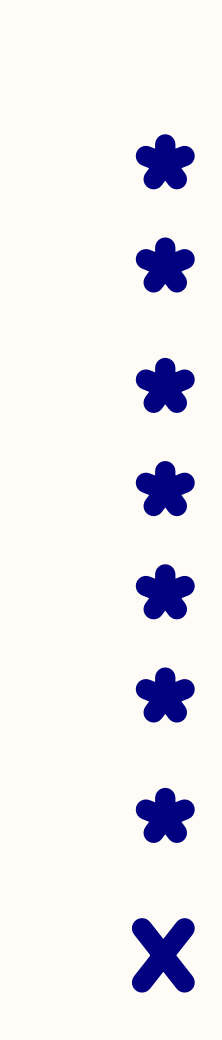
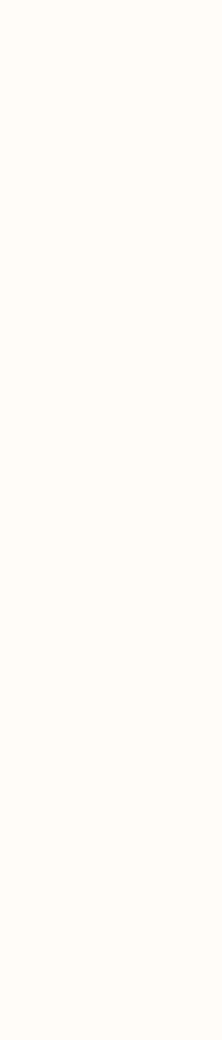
text: * (165, 161) -> none
text: * (165, 265) -> none
text: * (165, 385) -> none
text: * (165, 488) -> none
text: * (165, 591) -> none
text: * (165, 695) -> none
text: * (165, 815) -> none
text: x (163, 955) -> none

